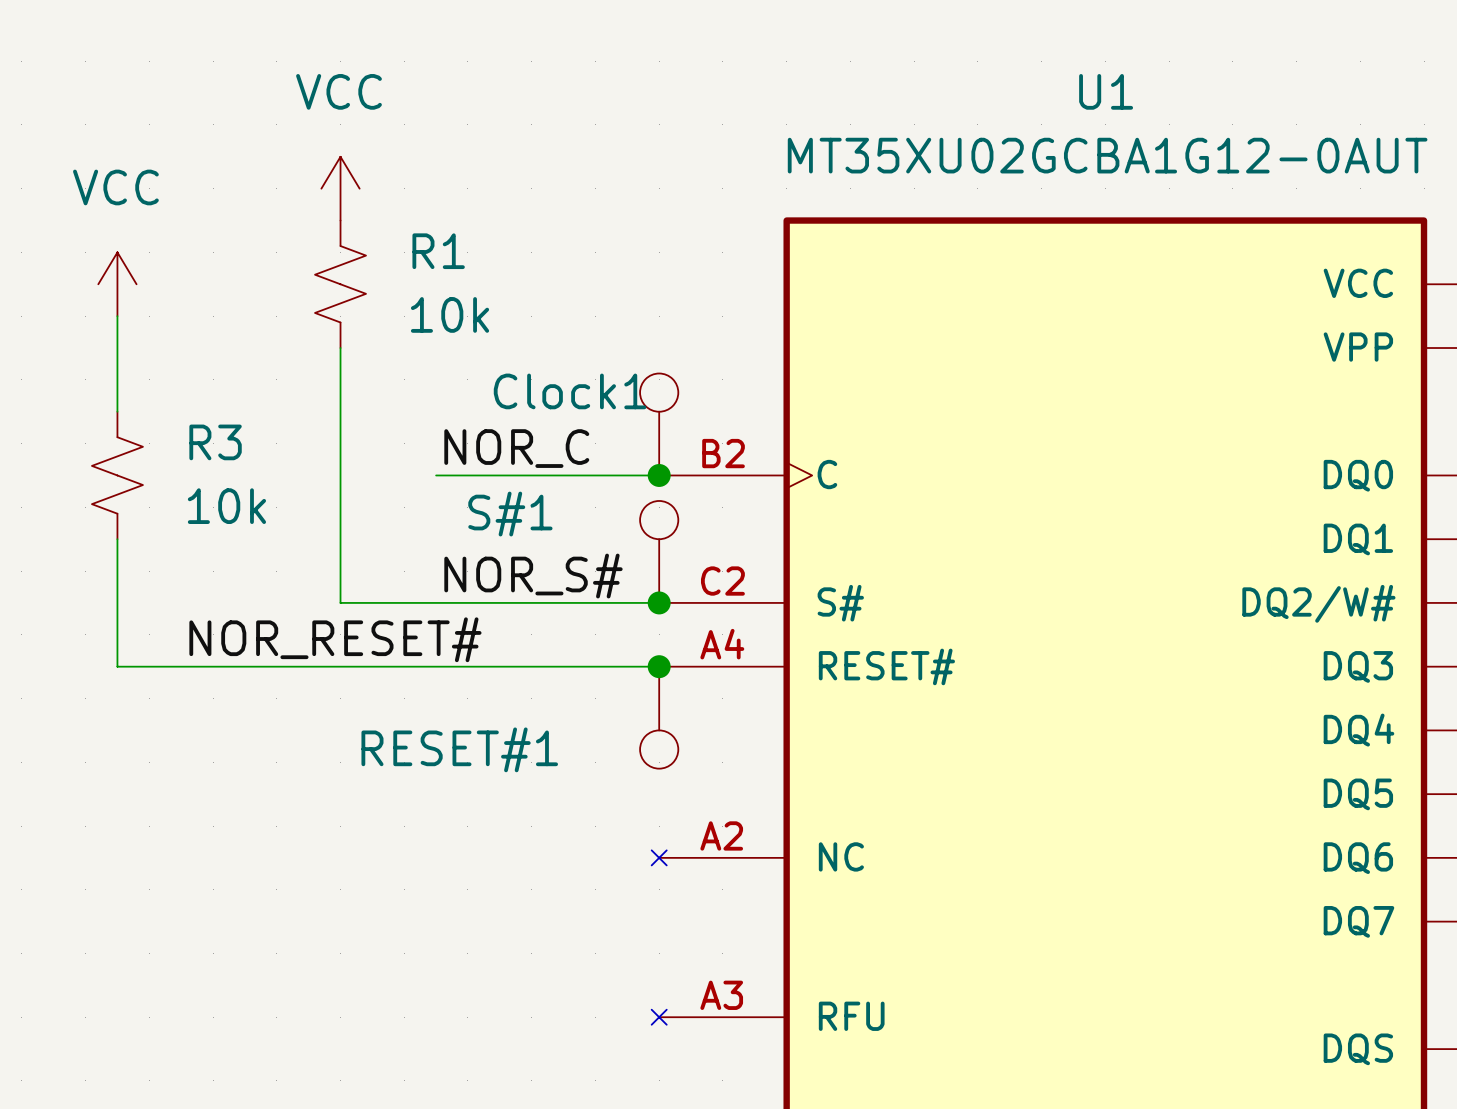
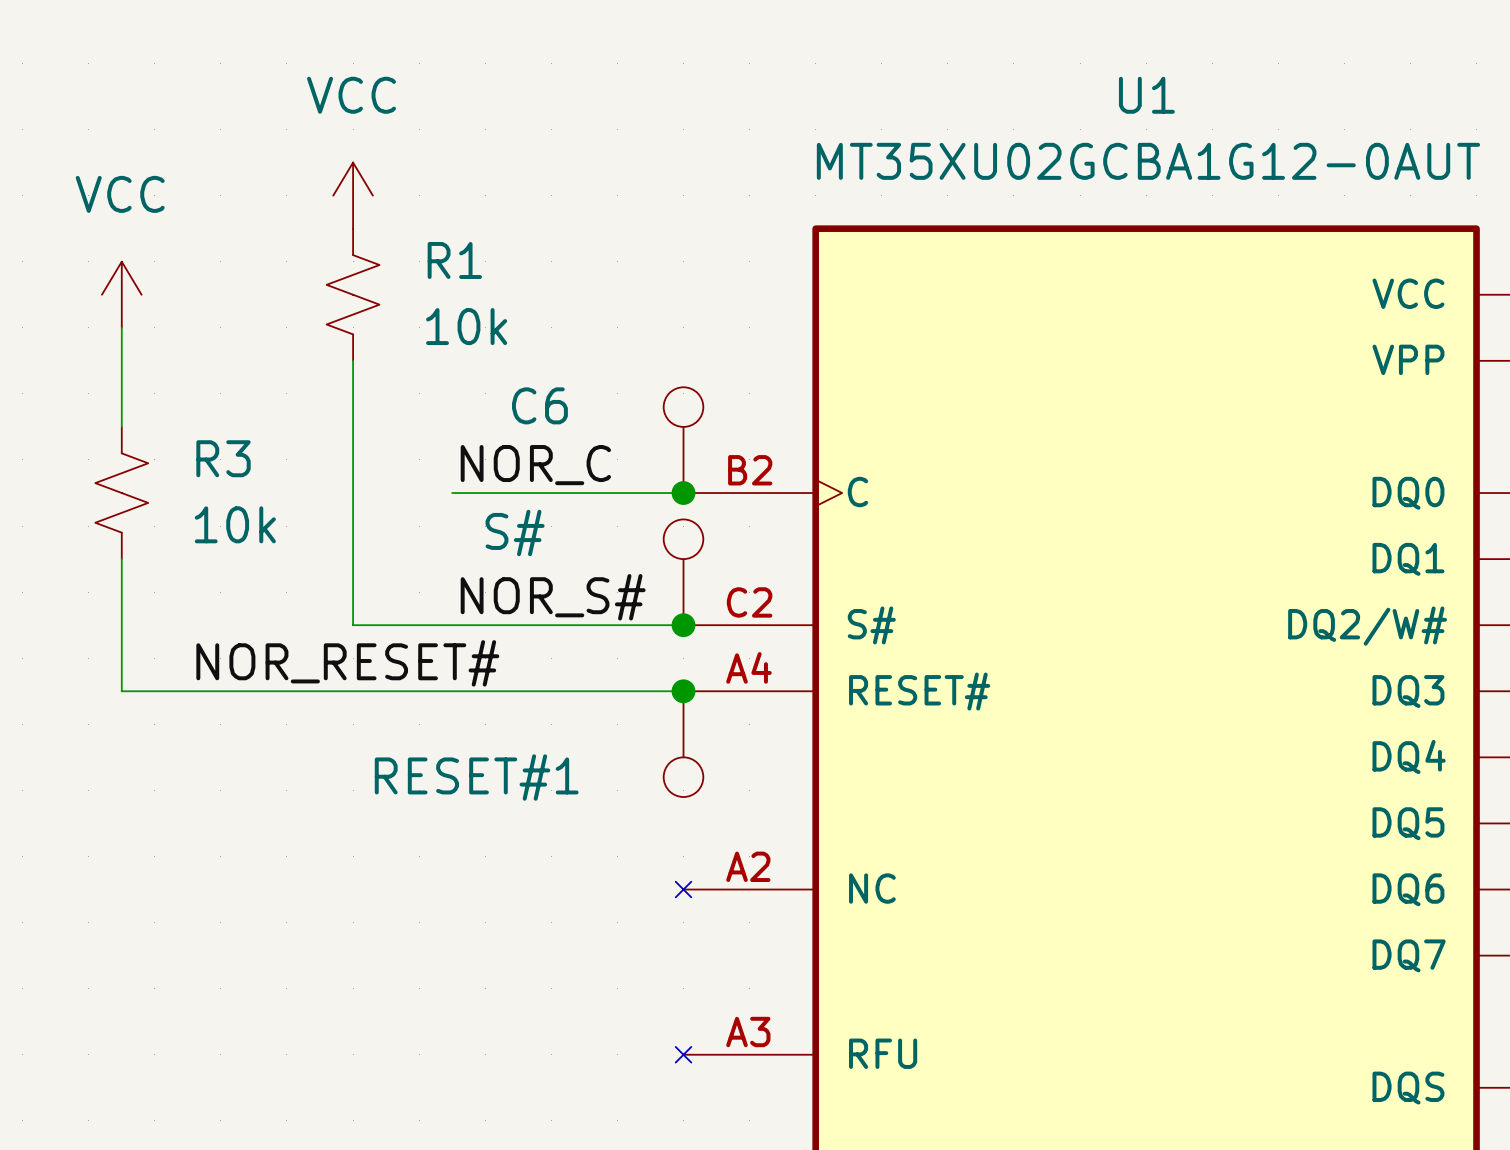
Clock1 name: Clock1 (570, 391) -> C6 (539, 405)
S#1 name: S#1 (510, 514) -> S# (515, 533)

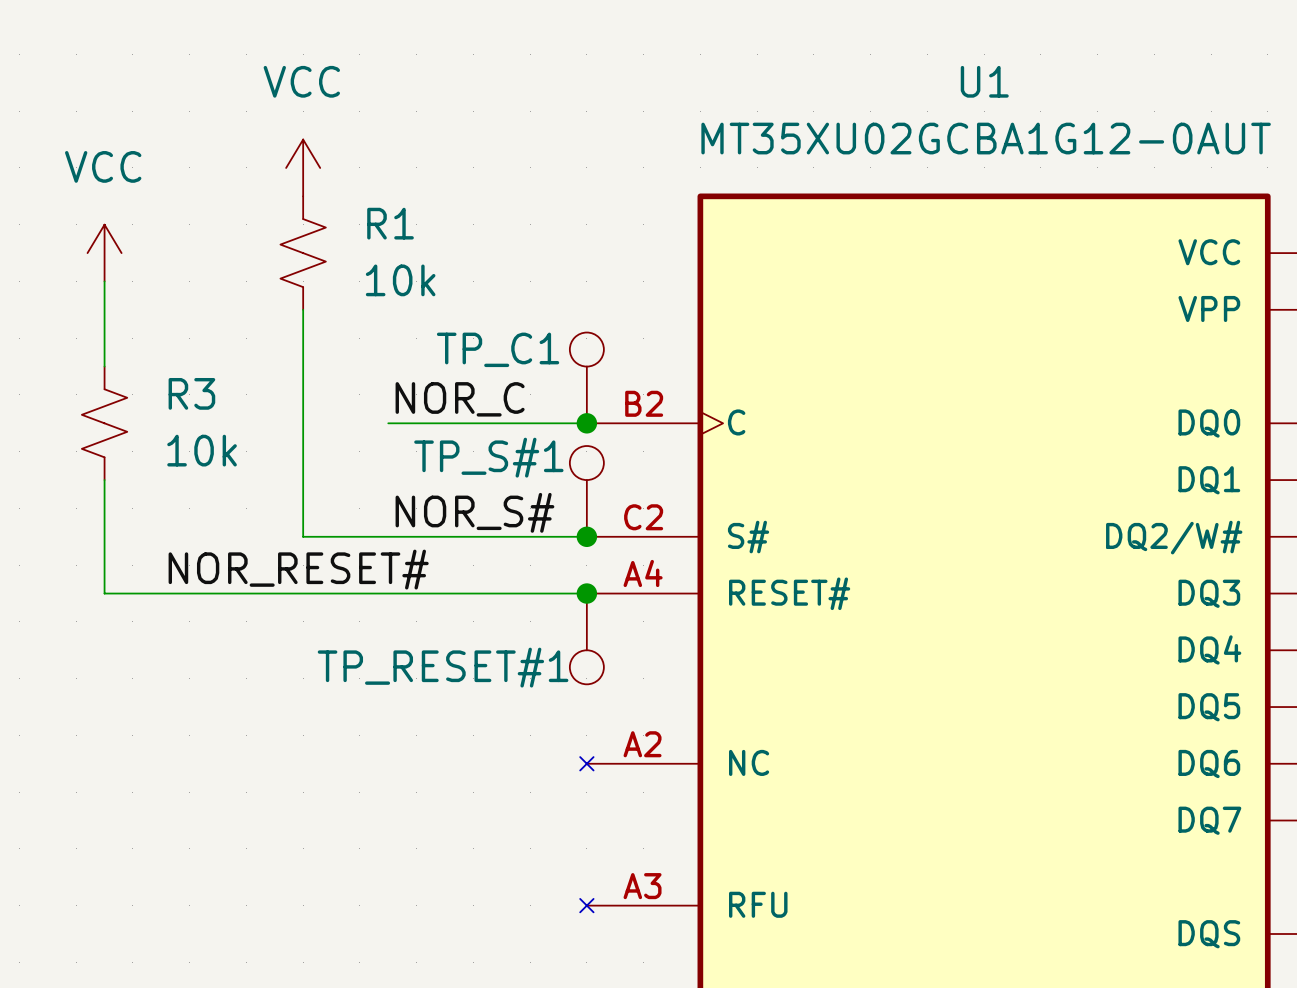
C6 name: C6 (539, 405) -> TP_C1 (498, 349)
S# name: S# (515, 533) -> TP_S#1 (488, 457)
RESET#1 name: RESET#1 (476, 777) -> TP_RESET#1 (443, 667)

